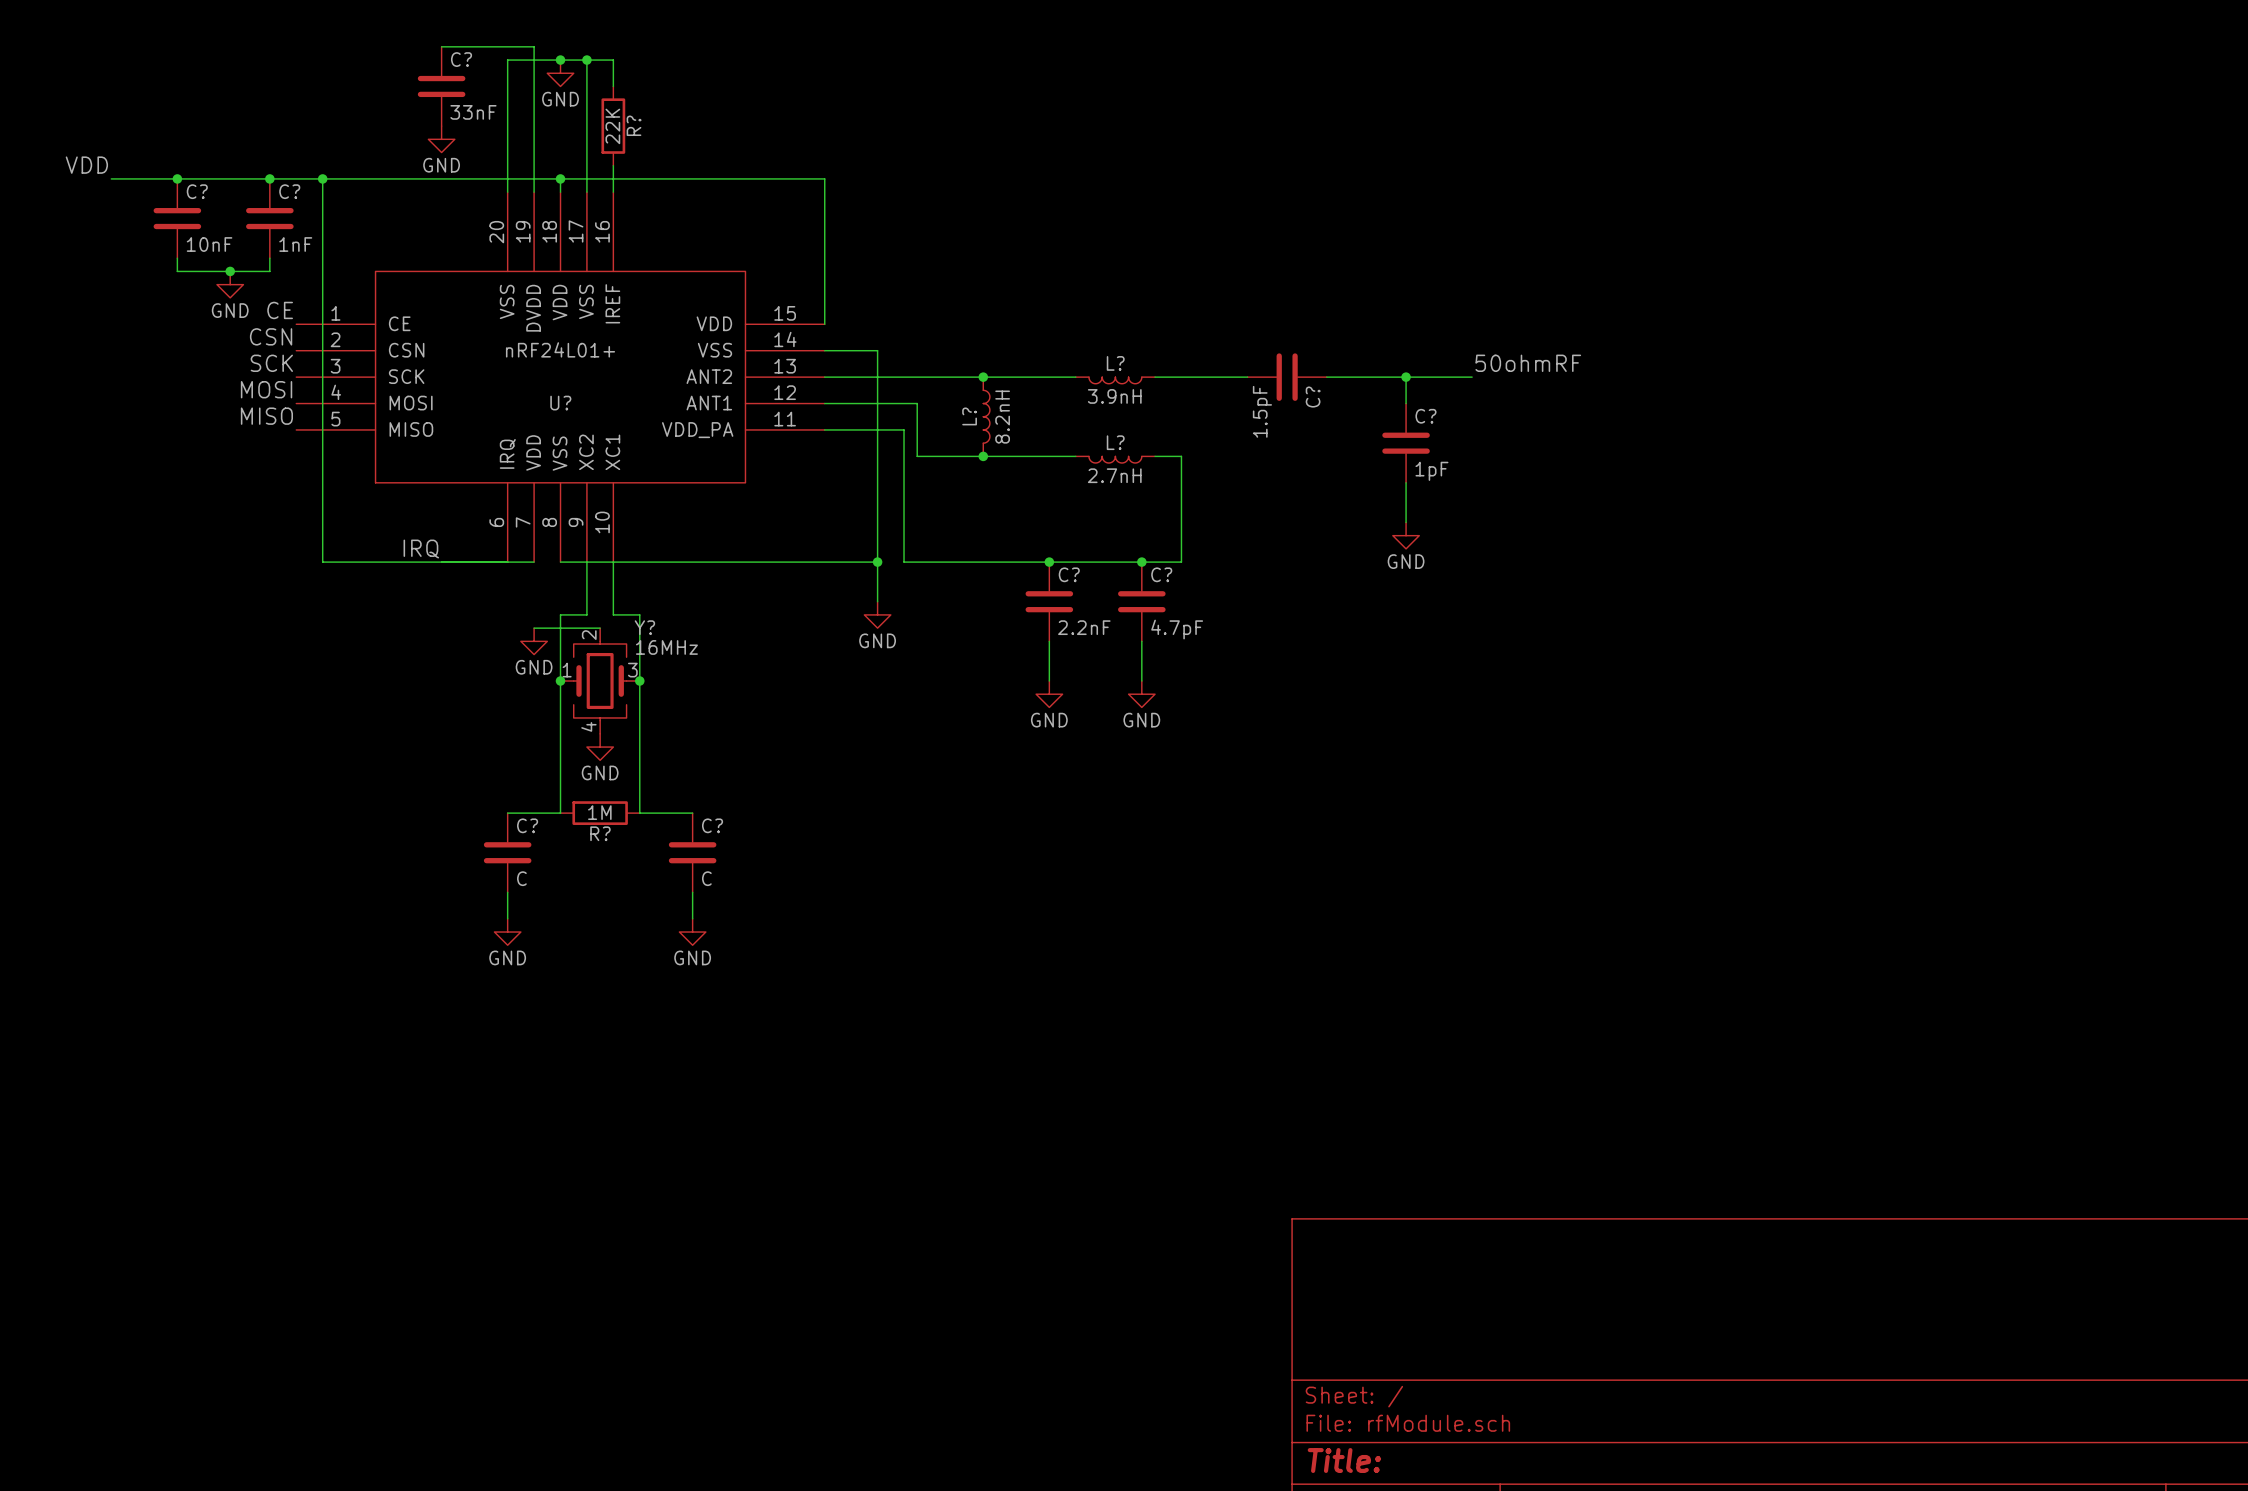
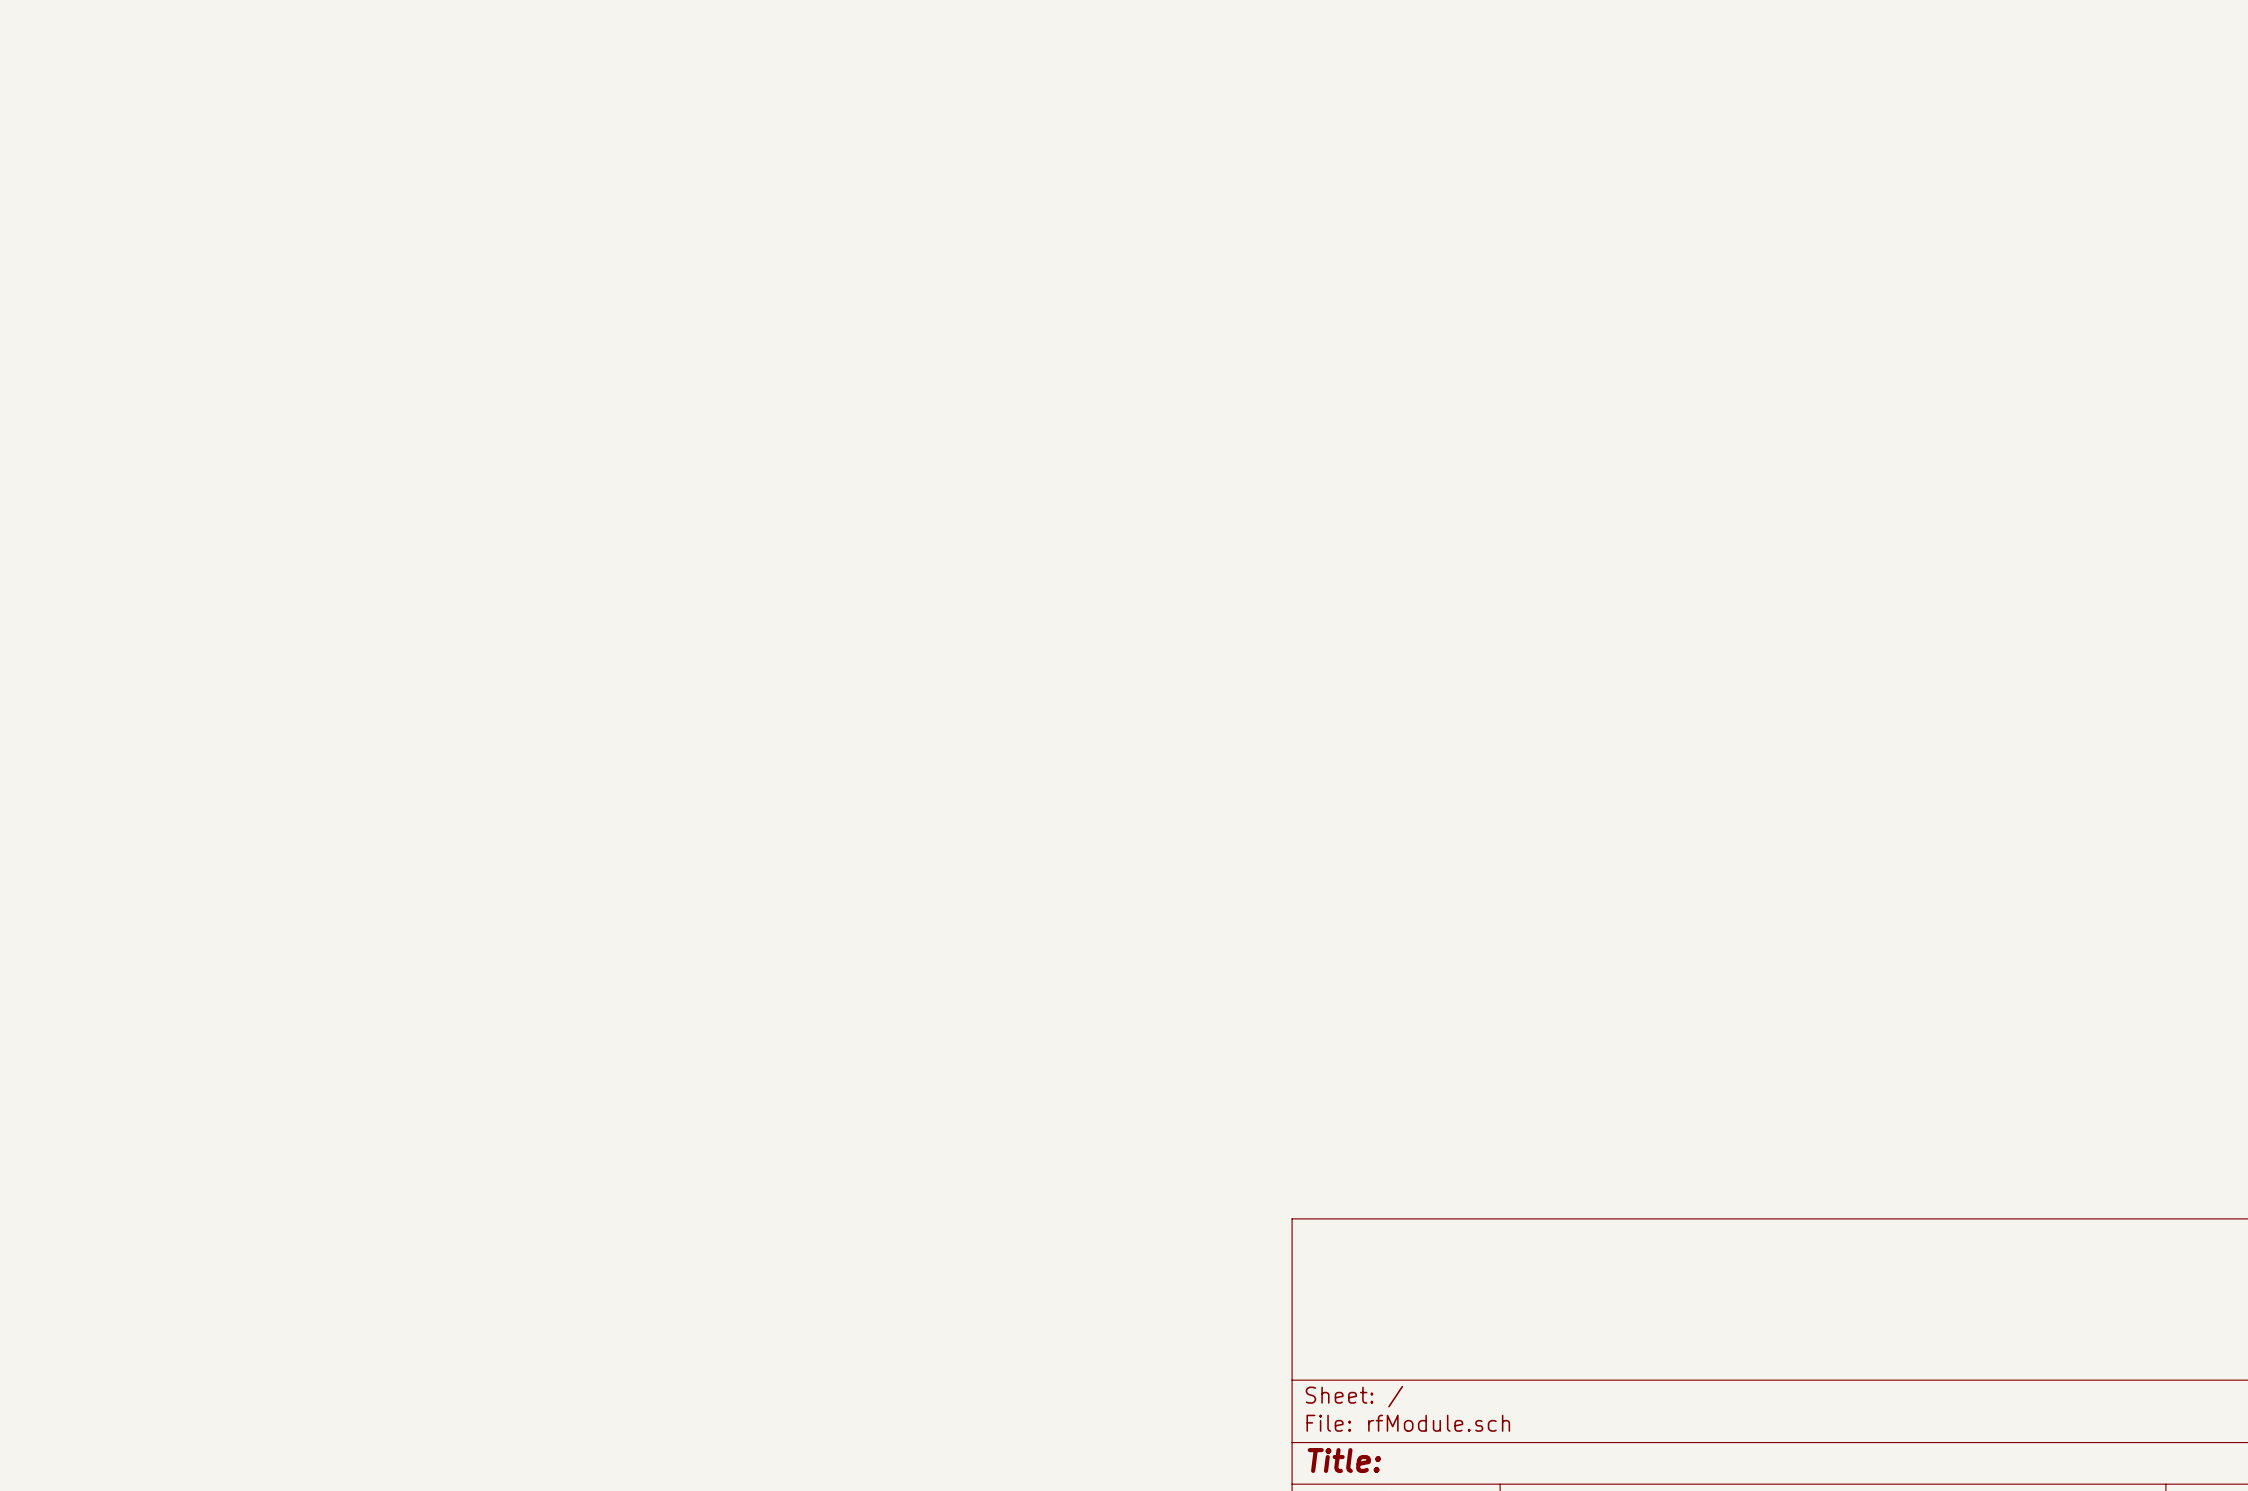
wire: (441, 46) (534, 46) (534, 192) -> none
junction: (560, 60) -> none
wire: (586, 60) (586, 192) -> none
junction: (586, 60) -> none
power symbol: GND (560, 73) -> none
C?: 33nF (441, 86) -> none
wire: (613, 86) (613, 60) (507, 60) (507, 192) -> none
R?: 22K (613, 126) -> none
power symbol: GND (441, 139) -> none
label: VDD (86, 165) -> none
wire: (613, 165) (613, 192) -> none
wire: (111, 178) (824, 178) (824, 324) -> none
junction: (177, 178) -> none
junction: (269, 178) -> none
wire: (322, 178) (322, 562) (534, 562) -> none
junction: (322, 178) -> none
wire: (560, 178) (560, 192) -> none
junction: (560, 178) -> none
C?: 10nF (177, 218) -> none
C?: 1nF (269, 218) -> none
wire: (177, 258) (177, 271) (269, 271) (269, 258) -> none
junction: (230, 271) -> none
power symbol: GND (230, 284) -> none
label: CE (280, 310) -> none
label: CSN (271, 336) -> none
wire: (824, 350) (877, 350) (877, 601) -> none
label: SCK (271, 363) -> none
label: 50ohmRF (1528, 363) -> none
U?: nRF24L01+ (560, 377) -> none
wire: (824, 377) (1075, 377) -> none
junction: (983, 377) -> none
wire: (1155, 377) (1247, 377) -> none
C?: 1.5pF (1287, 377) -> none
wire: (1326, 377) (1472, 377) -> none
wire: (1406, 377) (1406, 403) -> none
junction: (1406, 377) -> none
L?: 3.9nH (1115, 380) -> none
label: MOSI (266, 389) -> none
wire: (824, 403) (917, 403) (917, 456) (1075, 456) -> none
label: MISO (266, 416) -> none
L?: 8.2nH (986, 416) -> none
wire: (824, 429) (904, 429) (904, 562) (1181, 562) (1181, 456) (1155, 456) -> none
C?: 1pF (1406, 443) -> none
junction: (983, 456) -> none
L?: 2.7nH (1115, 459) -> none
wire: (1406, 482) (1406, 522) -> none
power symbol: GND (1406, 535) -> none
label: IRQ (421, 549) -> none
wire: (560, 562) (877, 562) -> none
wire: (586, 562) (586, 614) (560, 614) (560, 813) (507, 813) -> none
wire: (613, 562) (613, 614) (639, 614) (639, 813) (692, 813) -> none
junction: (877, 562) -> none
junction: (1049, 562) -> none
junction: (1141, 562) -> none
C?: 2.2nF (1049, 601) -> none
C?: 4.7pF (1141, 601) -> none
power symbol: GND (877, 614) -> none
wire: (534, 628) (600, 628) -> none
power symbol: GND (534, 641) -> none
wire: (1049, 641) (1049, 680) -> none
wire: (1141, 641) (1141, 680) -> none
junction: (560, 680) -> none
Y?: 16MHz (600, 680) -> none
junction: (639, 680) -> none
power symbol: GND (1049, 694) -> none
power symbol: GND (1141, 694) -> none
power symbol: GND (600, 747) -> none
R?: 1M (600, 813) -> none
C?: C (507, 852) -> none
C?: C (692, 852) -> none
wire: (507, 892) (507, 918) -> none
wire: (692, 892) (692, 918) -> none
power symbol: GND (507, 932) -> none
power symbol: GND (692, 932) -> none

